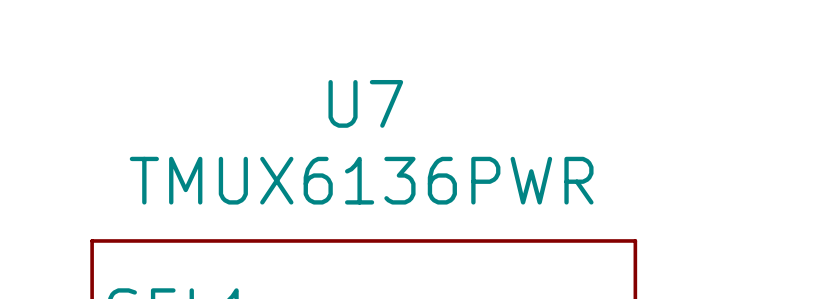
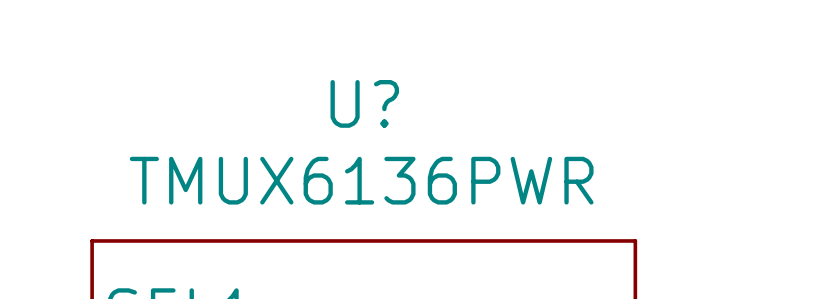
U7 name: U7 (365, 103) -> U? (364, 103)

